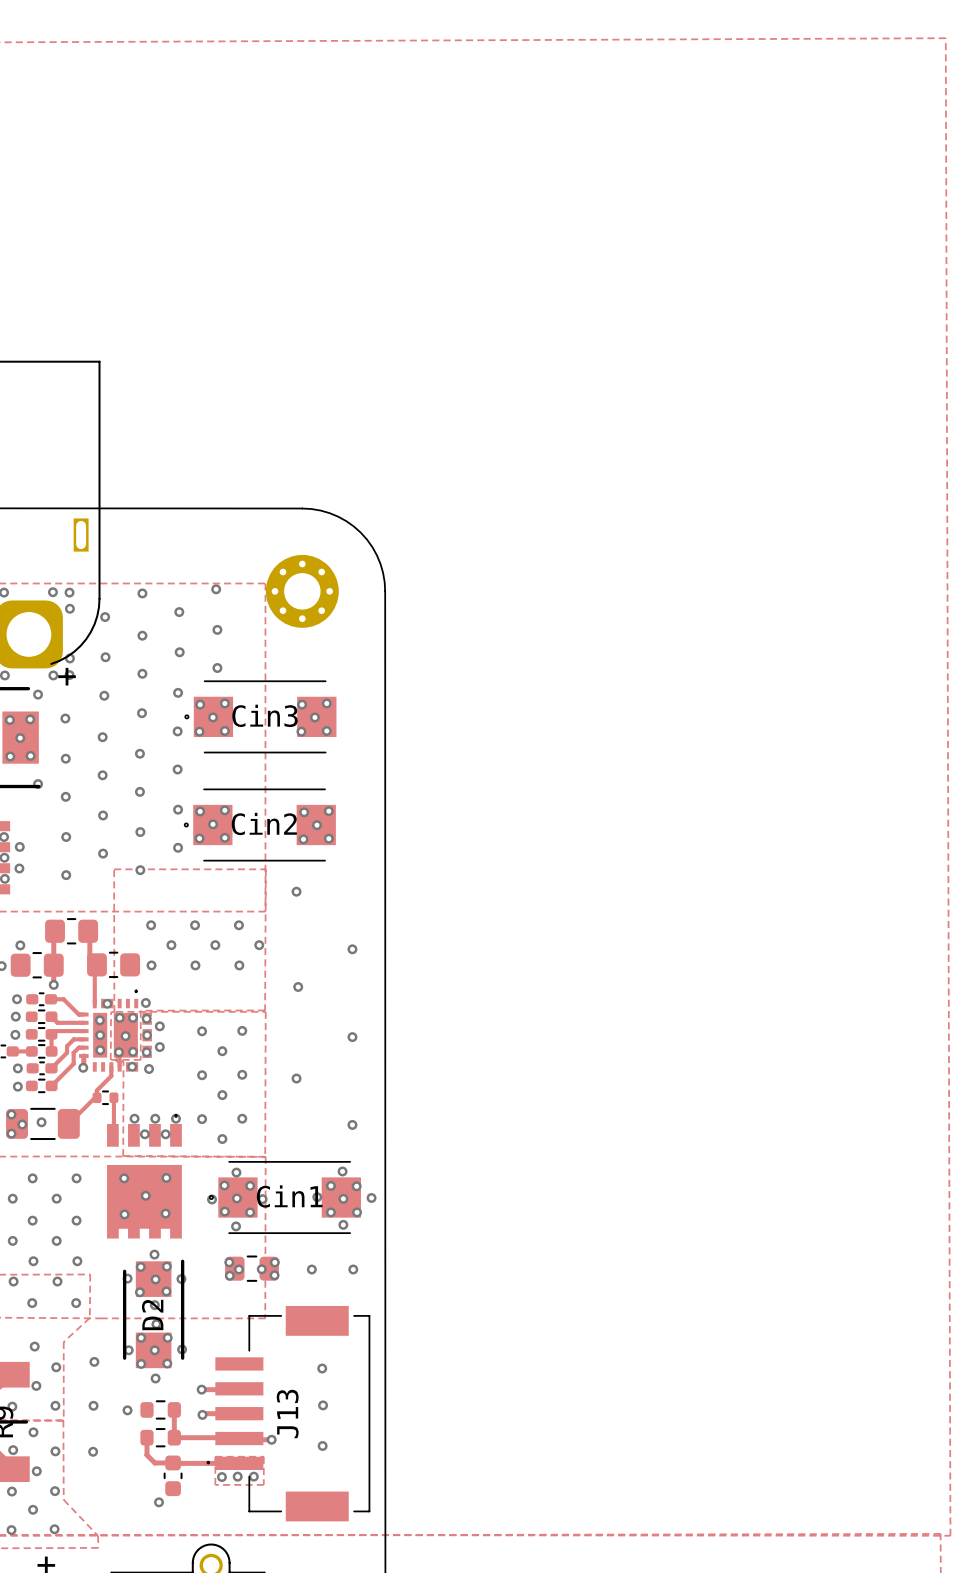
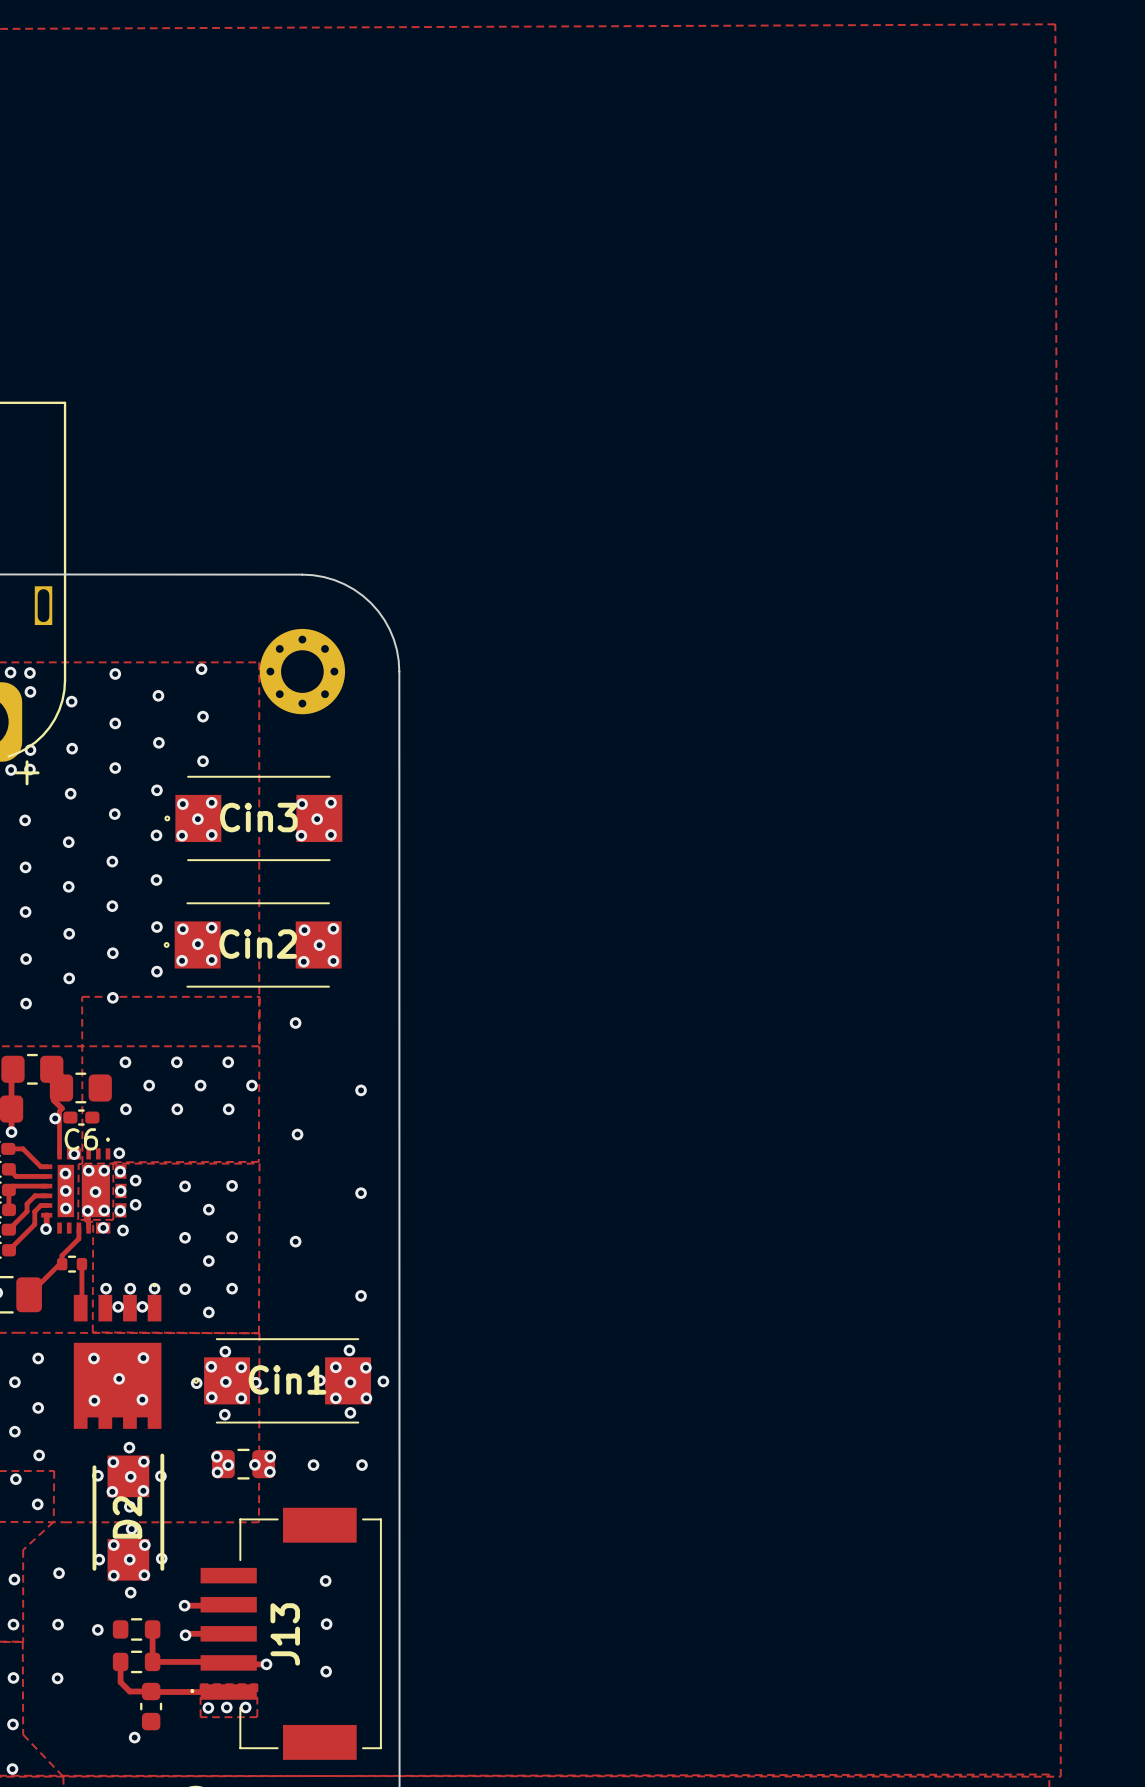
part position: (113, 964) -> (80, 1087)
C6: none -> (81, 1117)
via: none -> (55, 1118)

